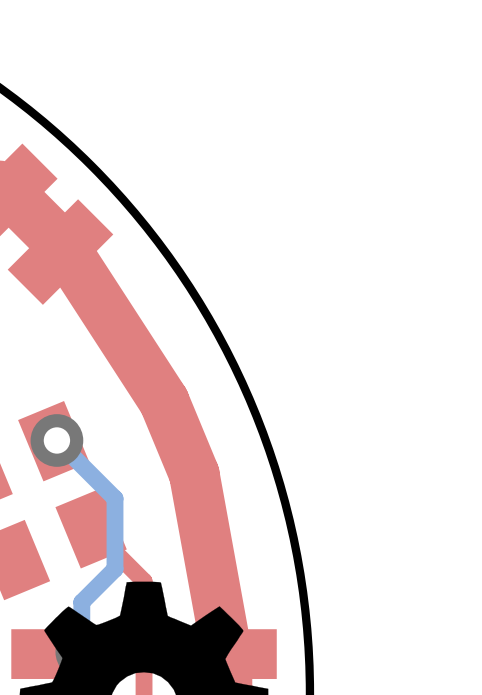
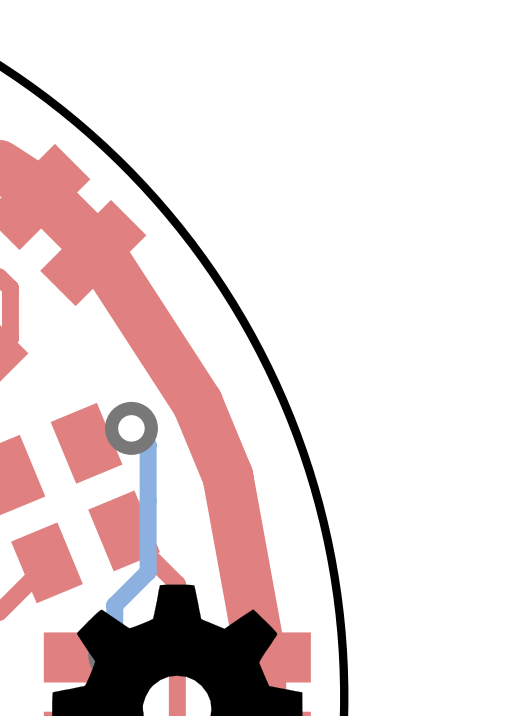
bottom track: (56, 440) (115, 498) -> (131, 428) (148, 445) (148, 500)
via position: (56, 440) -> (131, 428)

